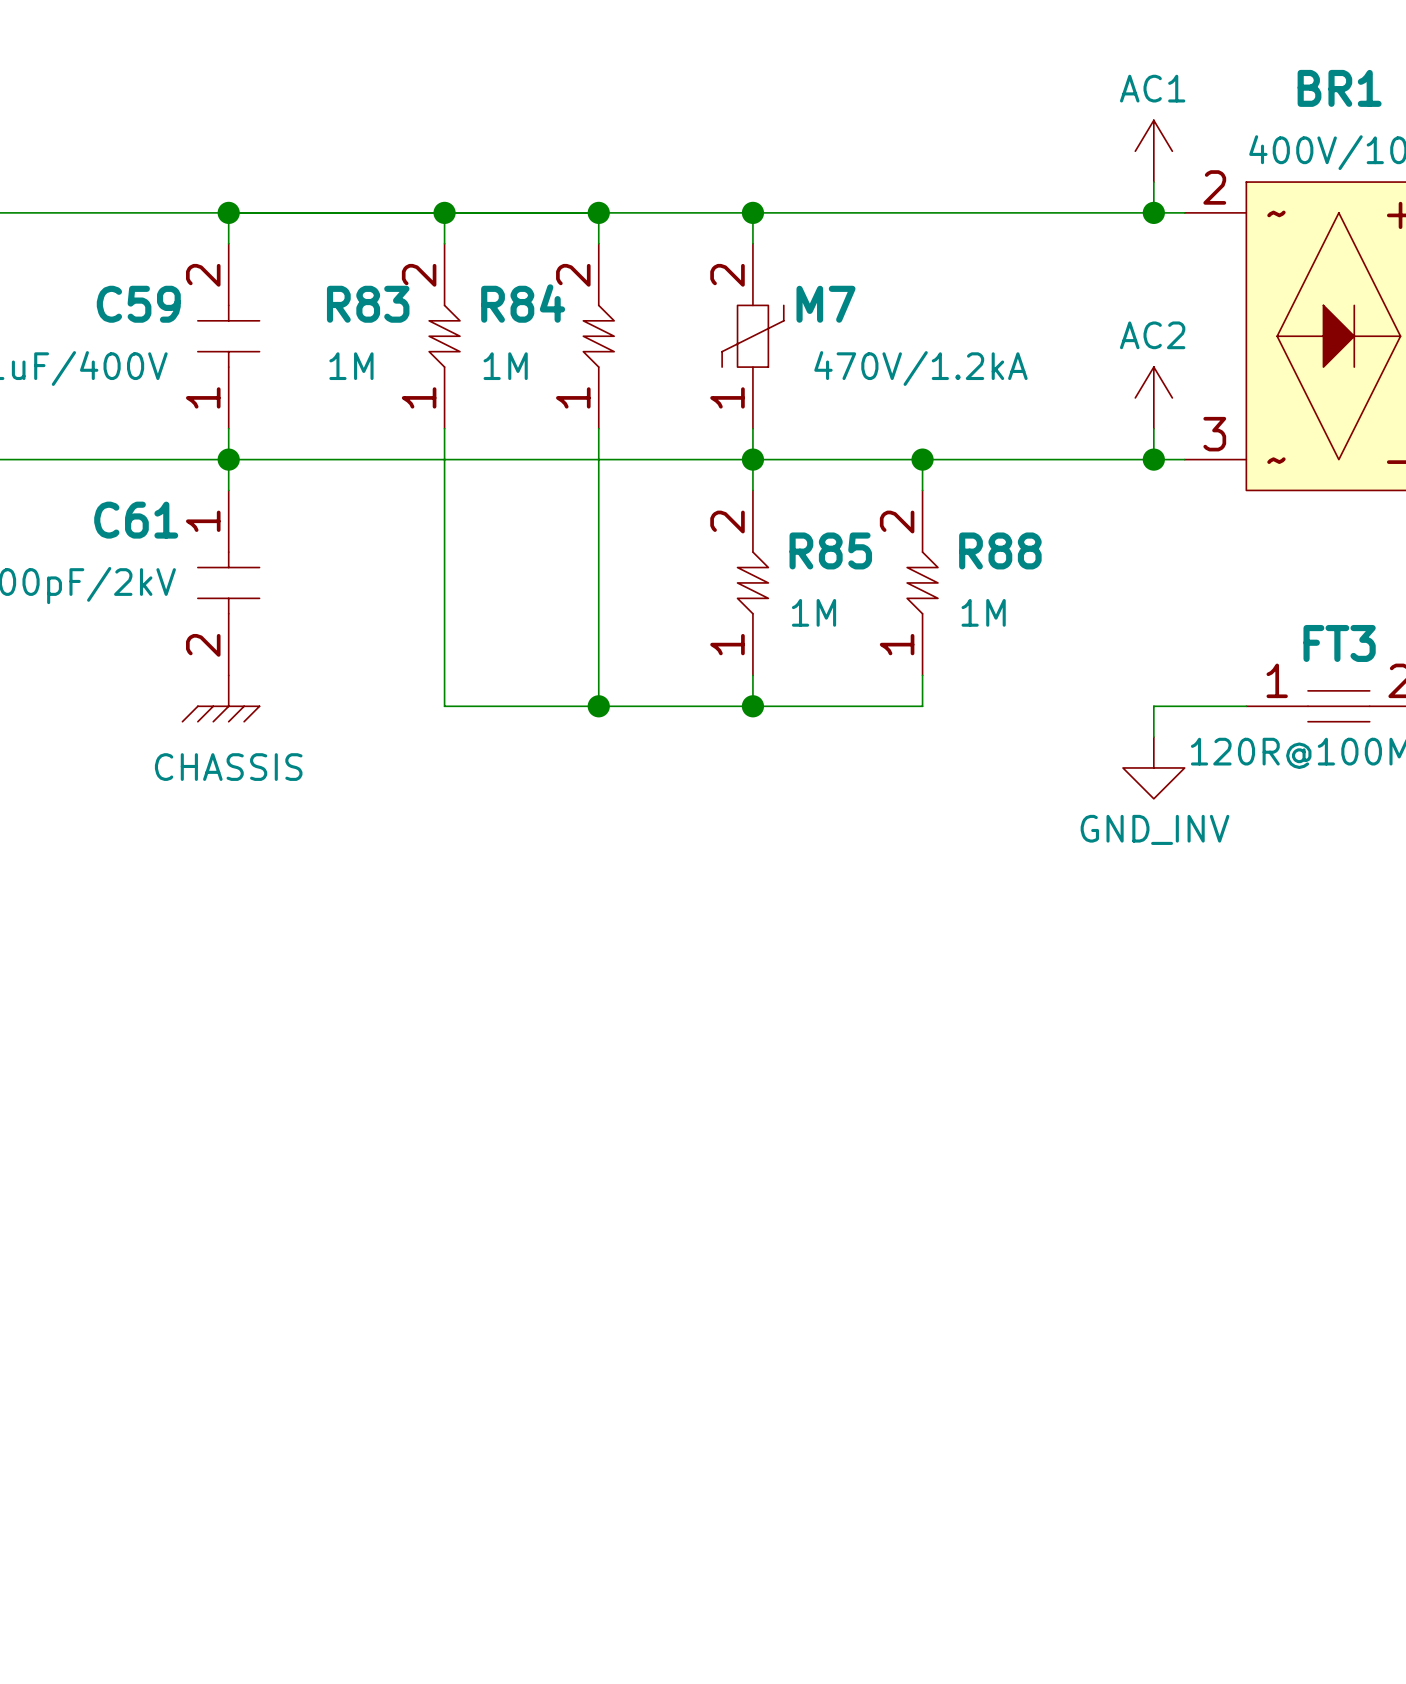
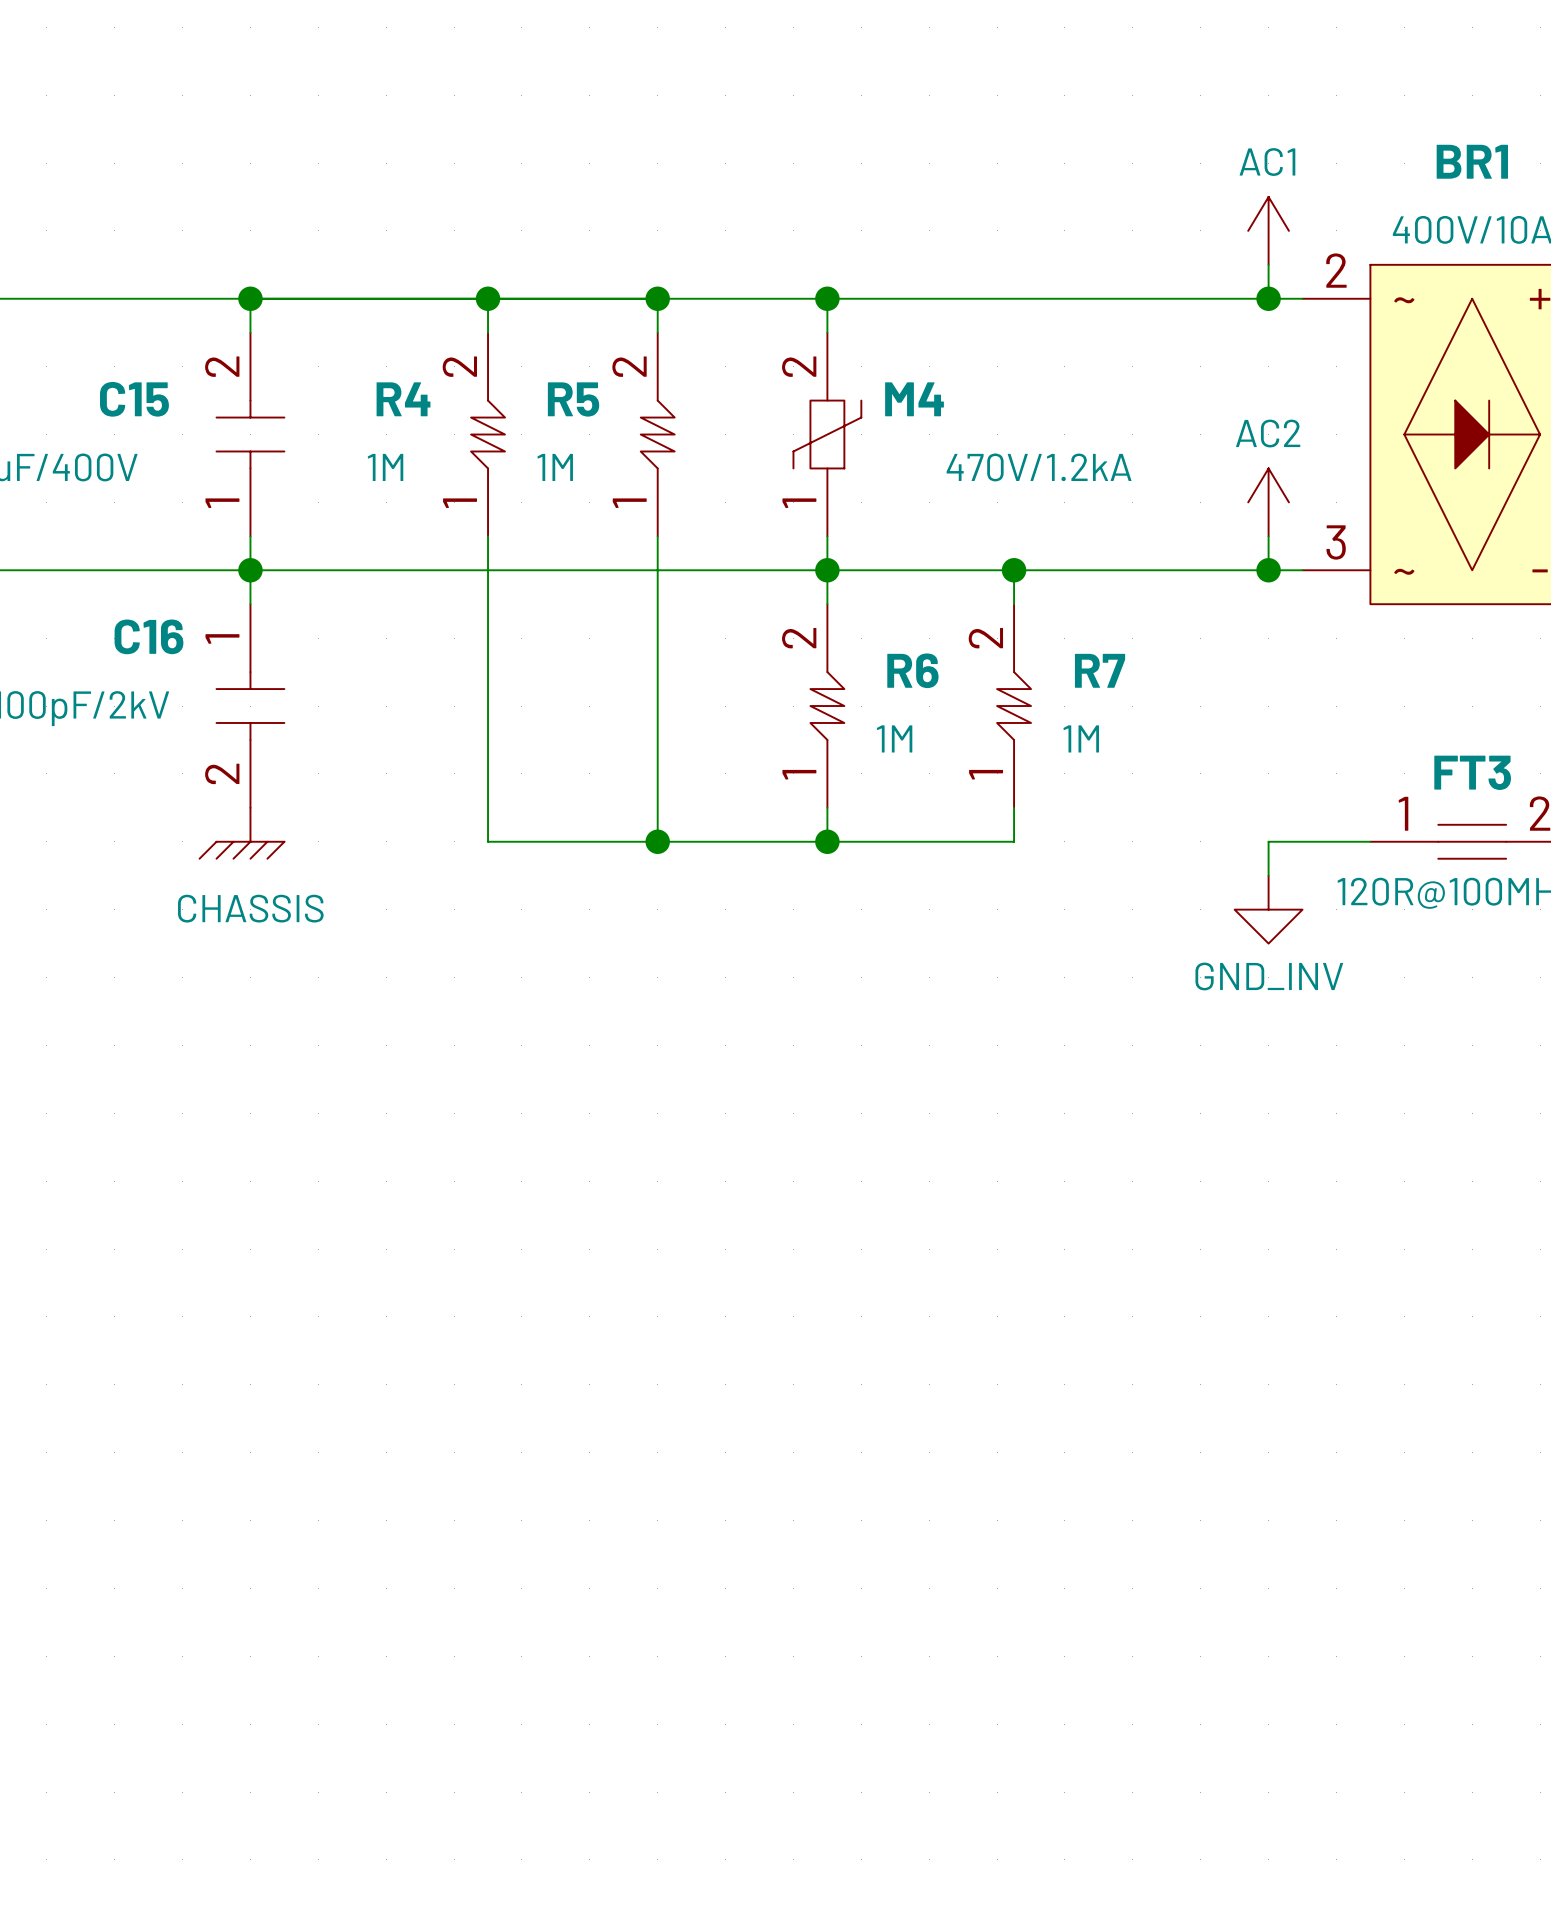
R84 name: R84 (523, 303) -> R5 (573, 399)
C59 name: C59 (138, 304) -> C15 (134, 399)
R83 name: R83 (368, 304) -> R4 (403, 399)
M7 name: M7 (825, 304) -> M4 (914, 399)
C61 name: C61 (136, 520) -> C16 (148, 636)
R85 name: R85 (830, 550) -> R6 (912, 670)
R88 name: R88 (1000, 550) -> R7 (1100, 670)

